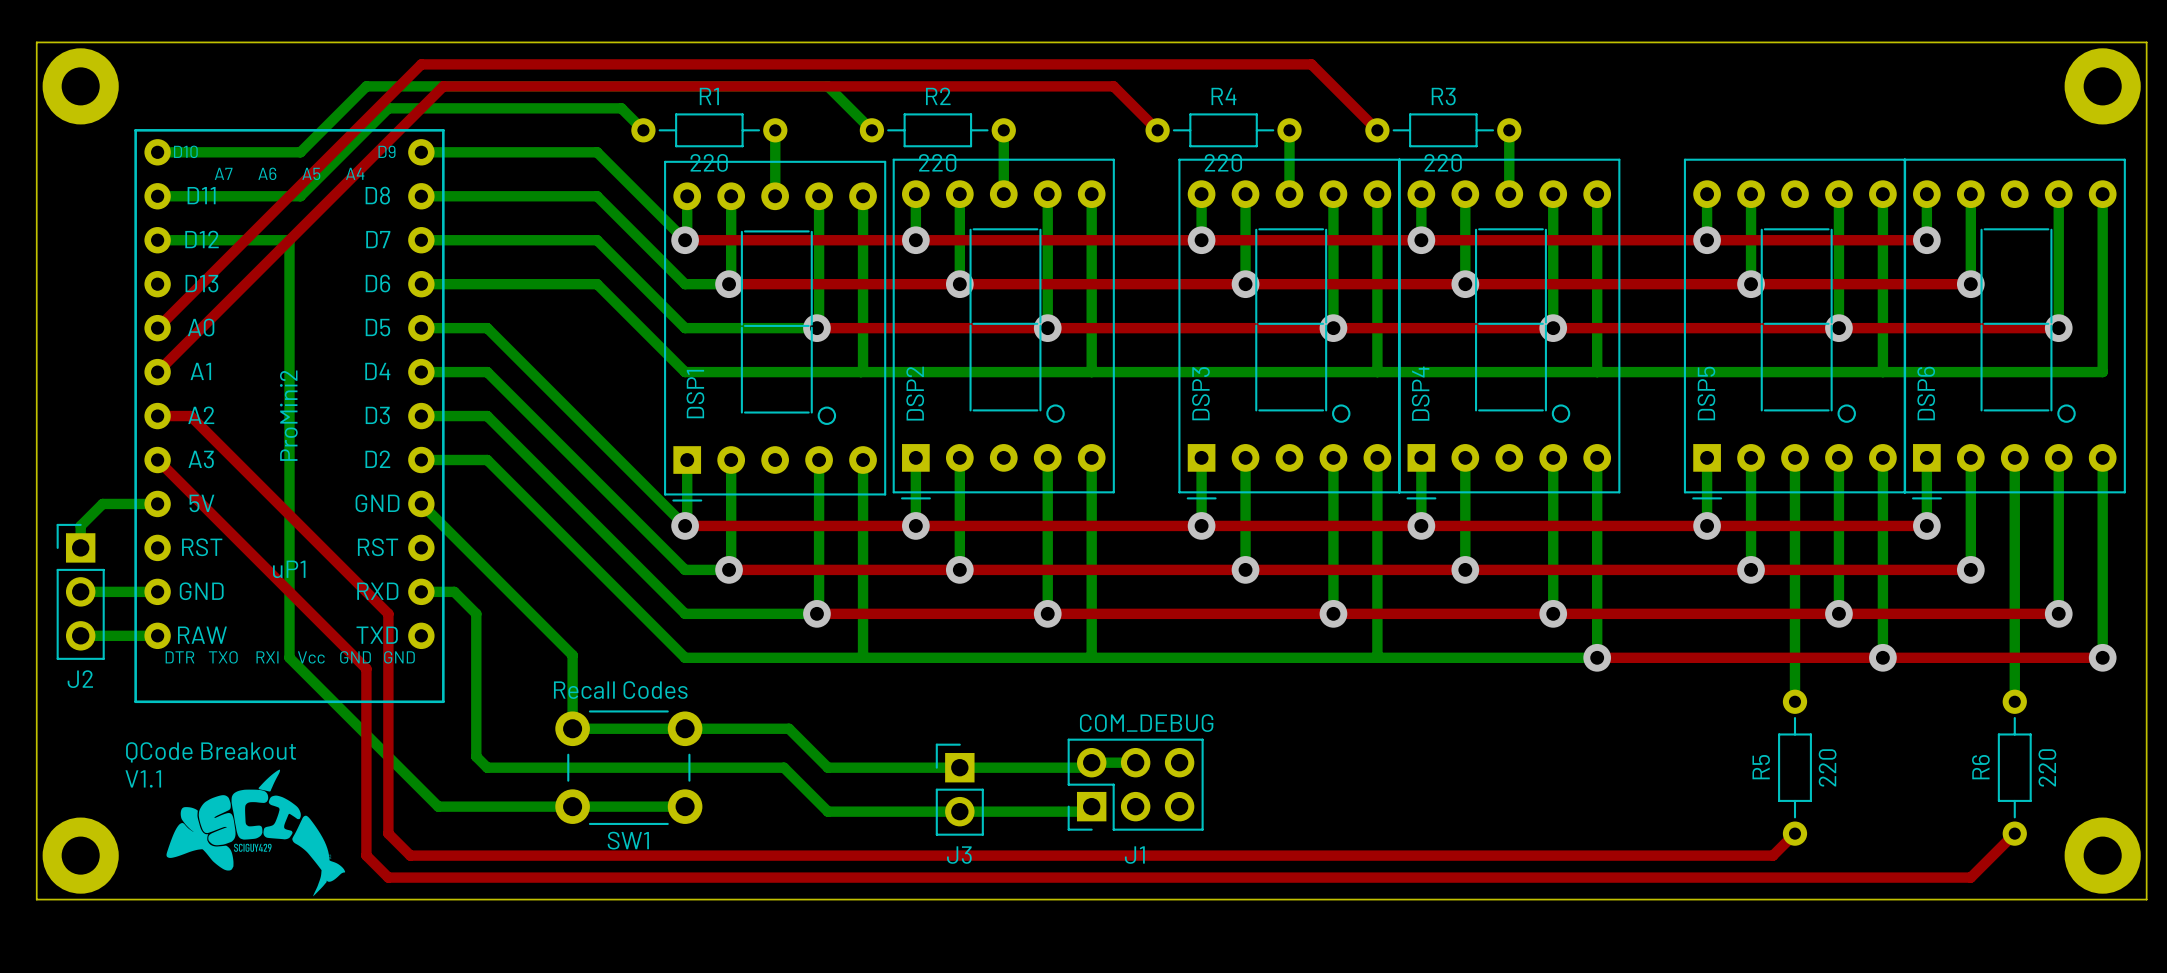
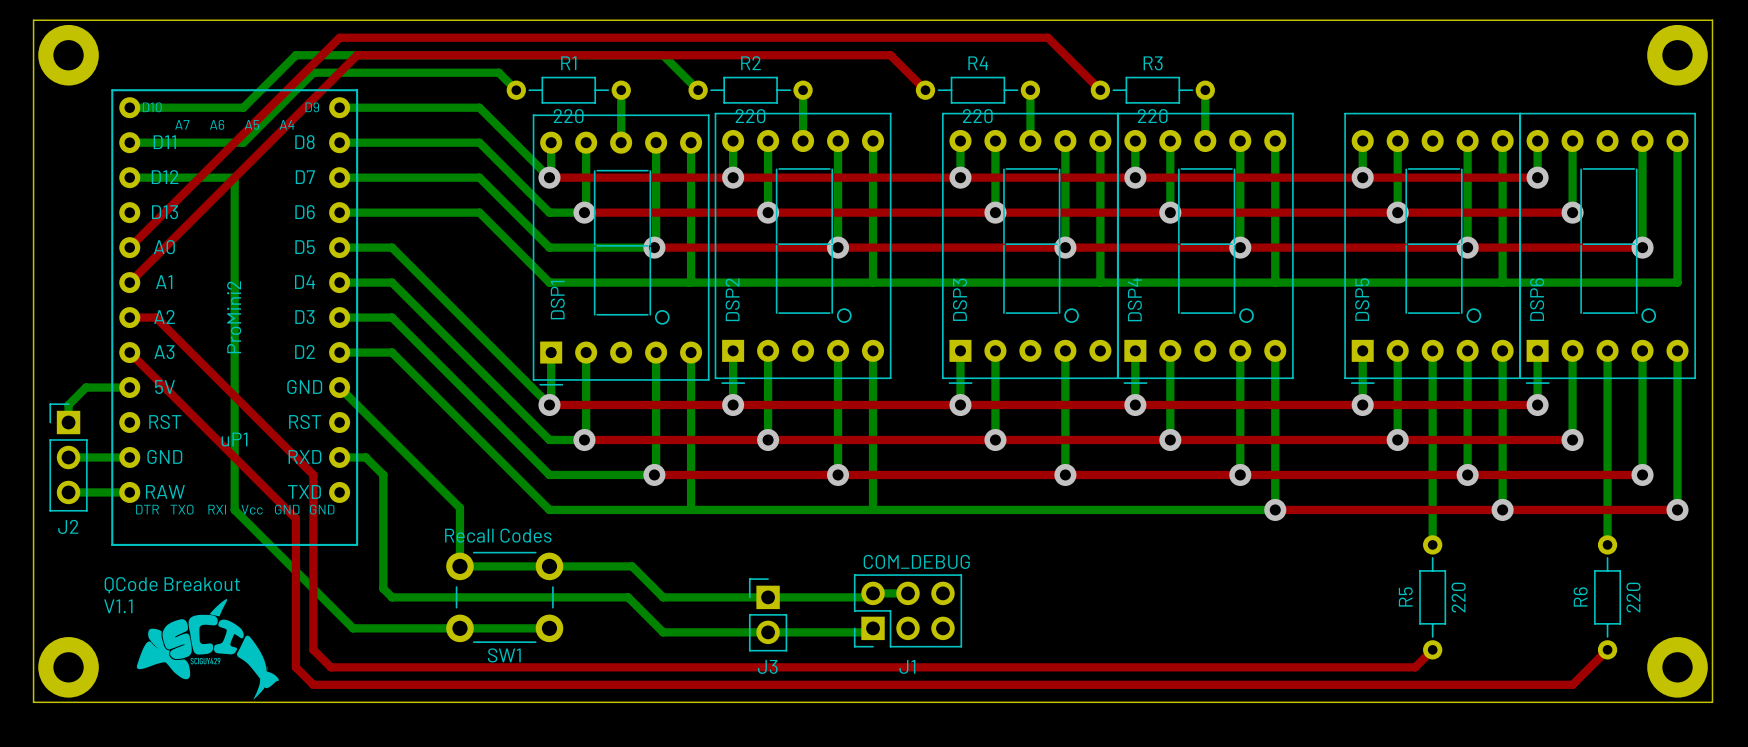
bottom track: (1377, 457) (1377, 657) -> none

